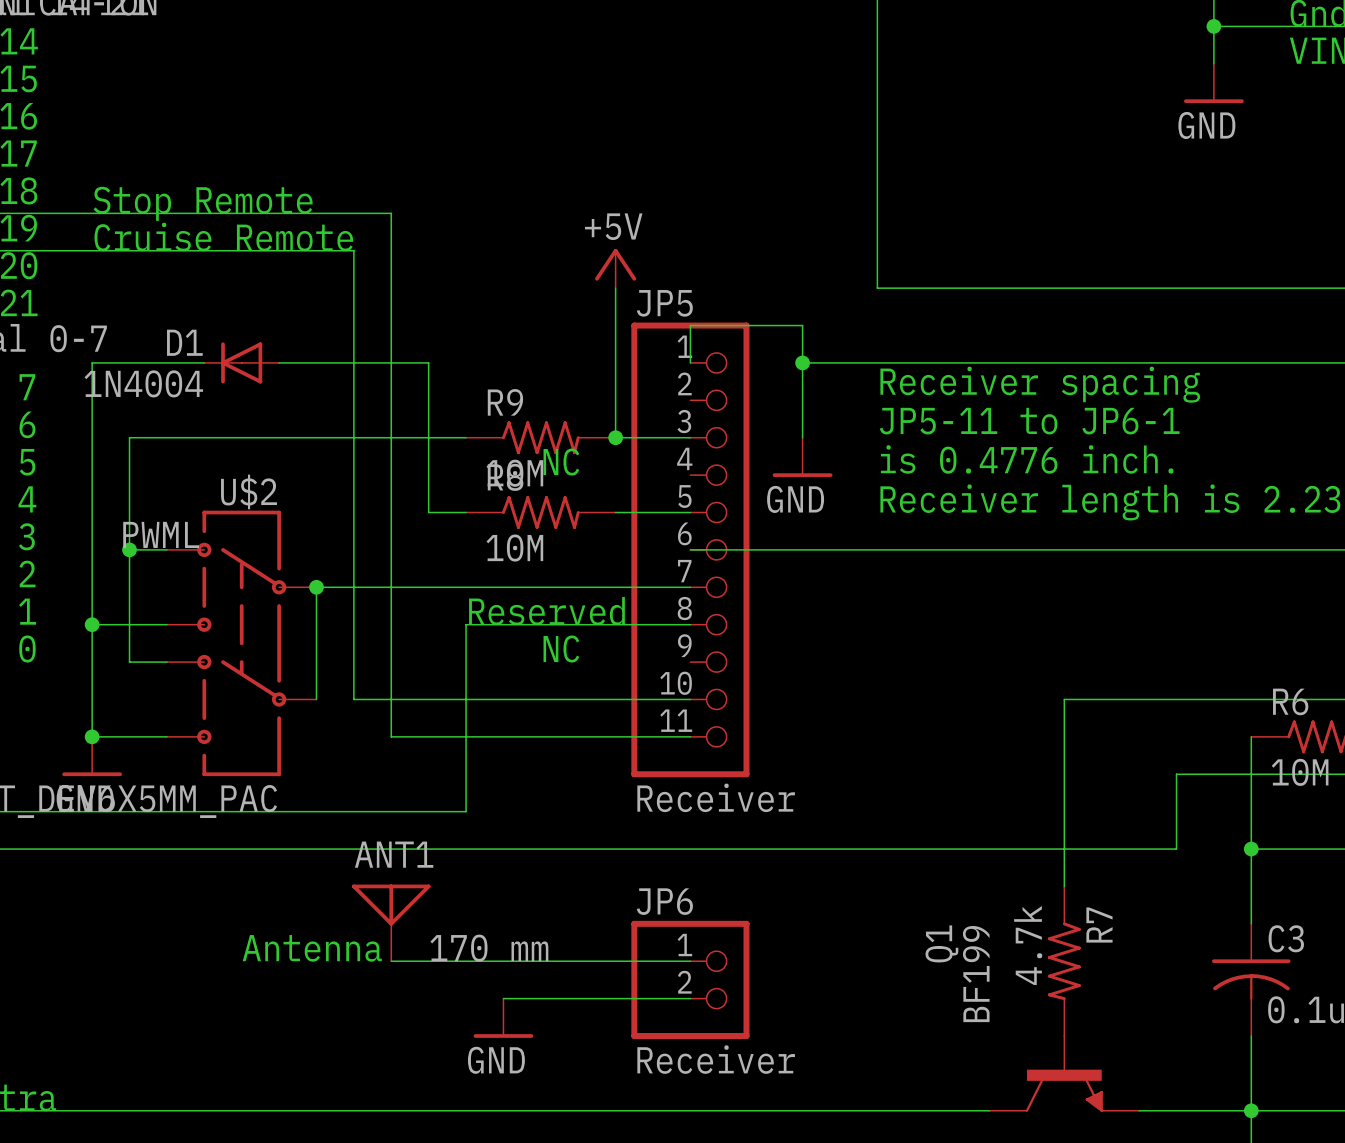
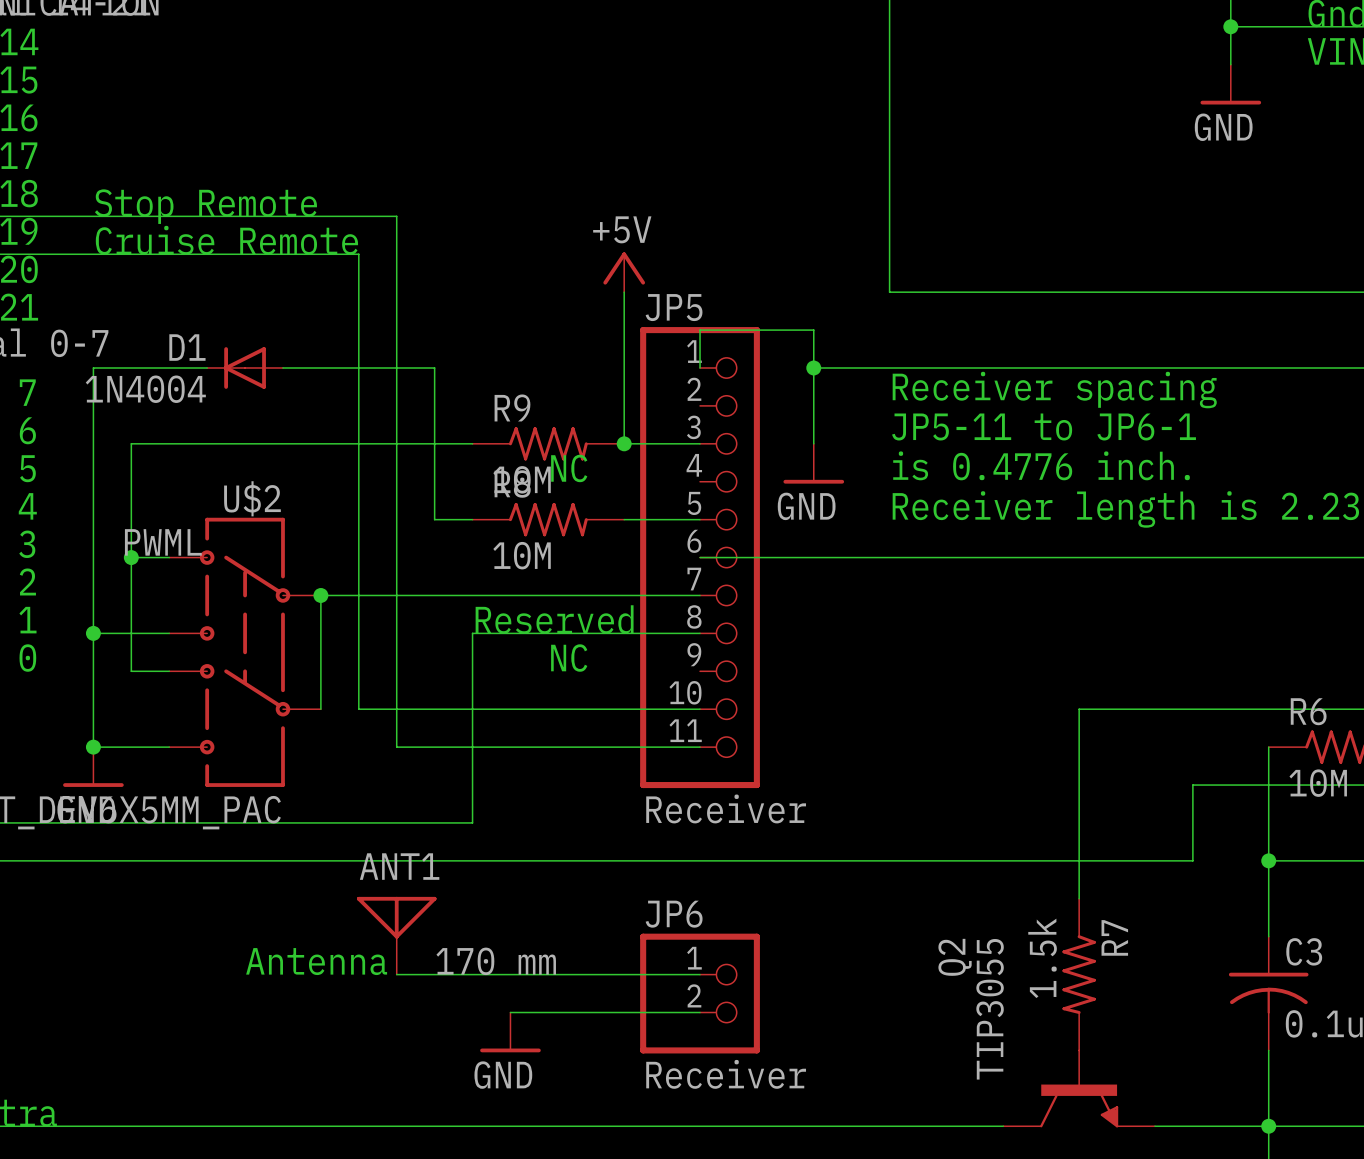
Q1 name: Q1 (941, 943) -> Q2 (955, 957)
R7 value: 4.7k (1028, 945) -> 1.5k (1042, 958)
Q1 value: BF199 (976, 974) -> TIP3055 (990, 1009)

